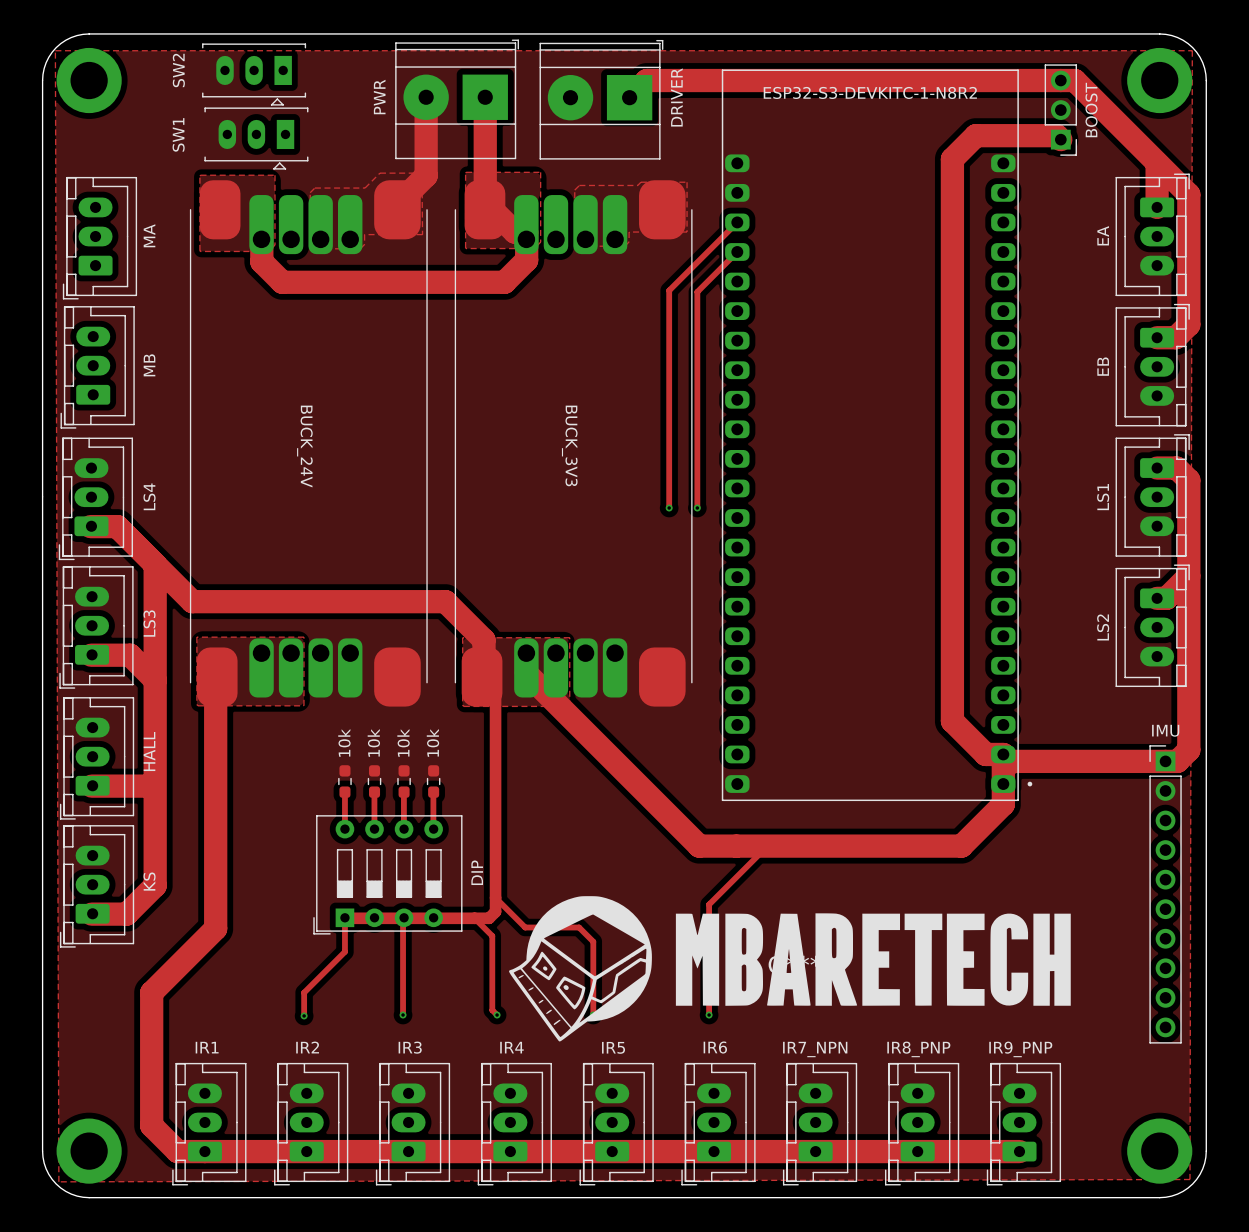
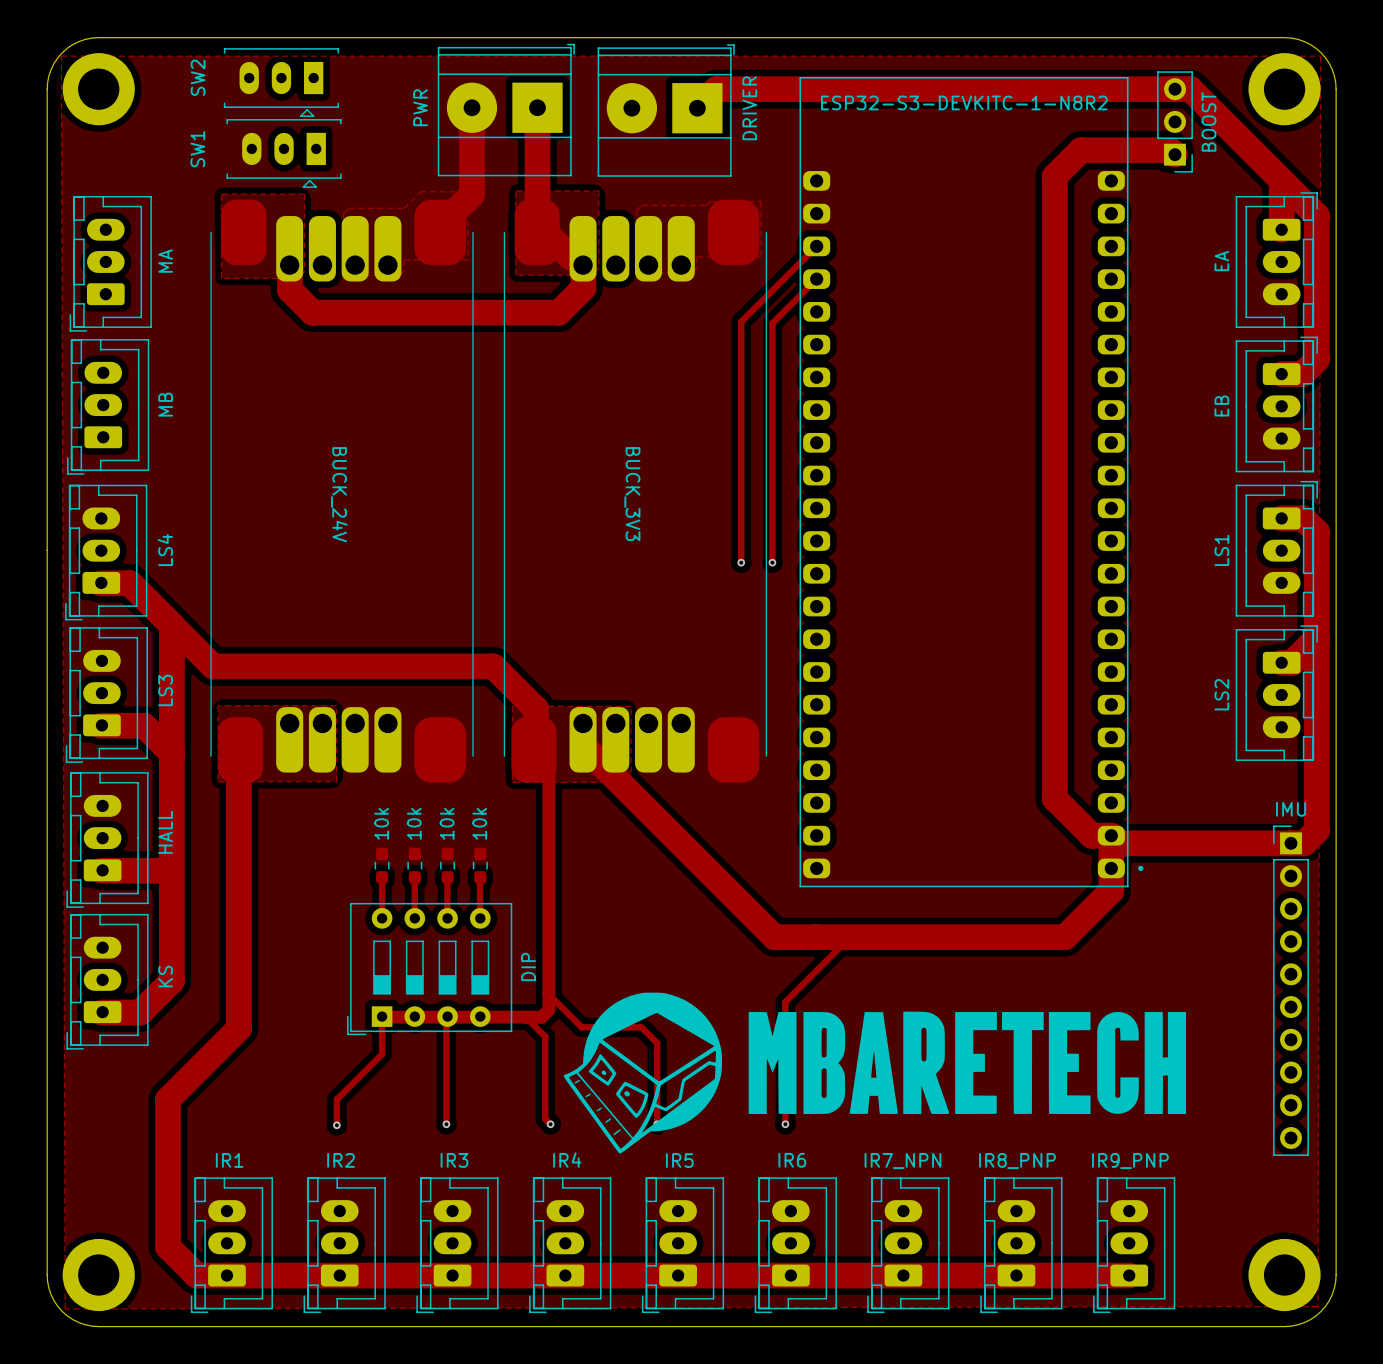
drawing: none -> [563, 992, 1187, 1154]
part: (789, 968) -> none

